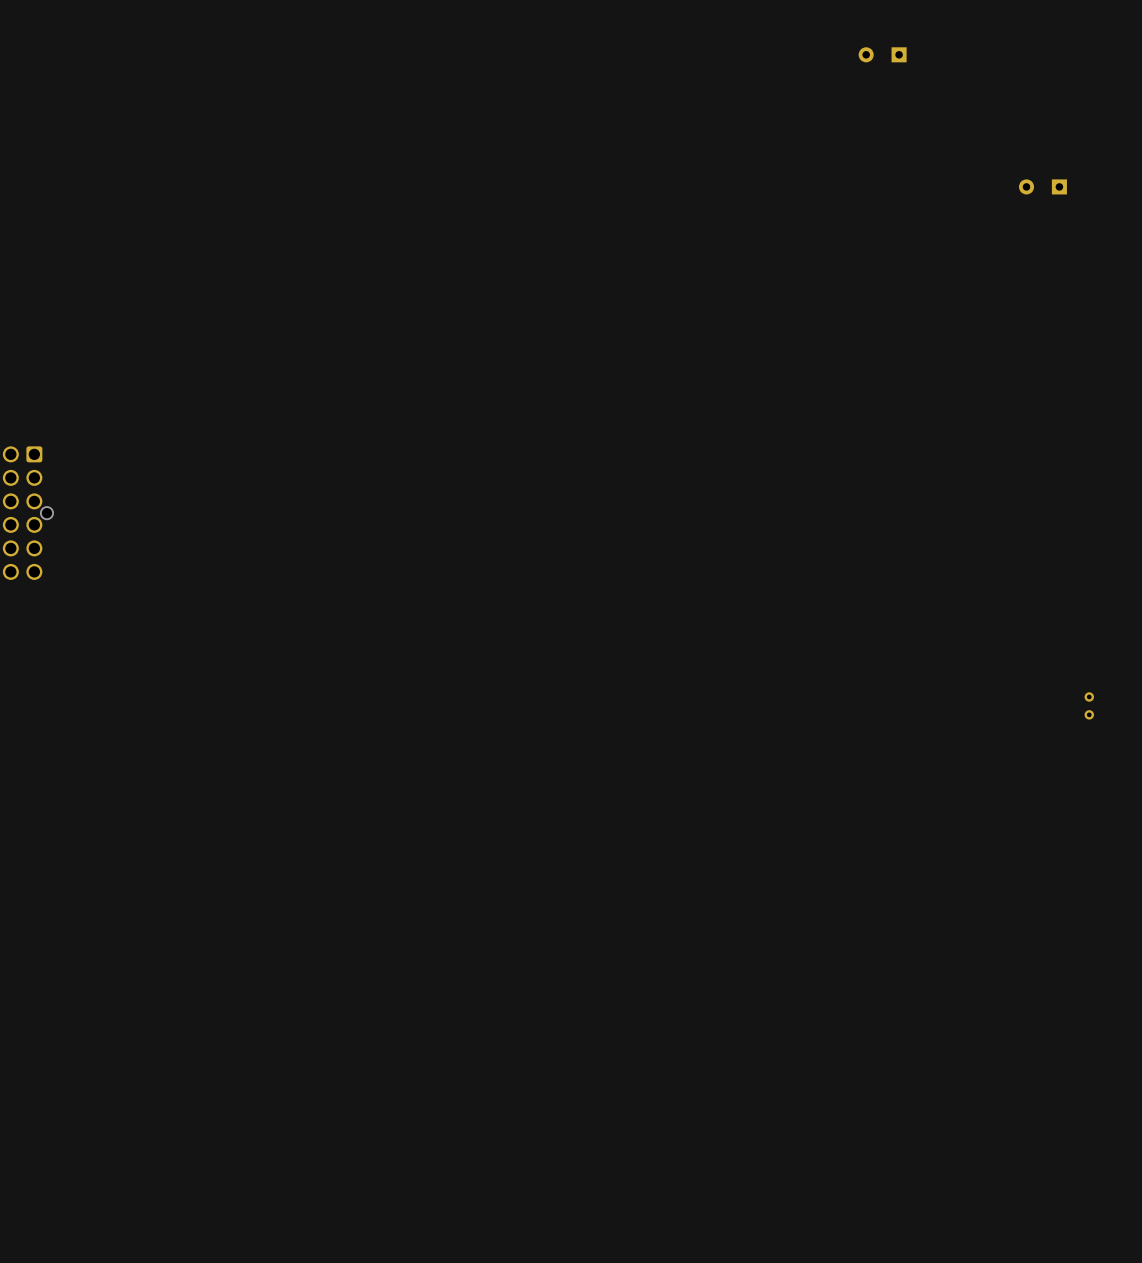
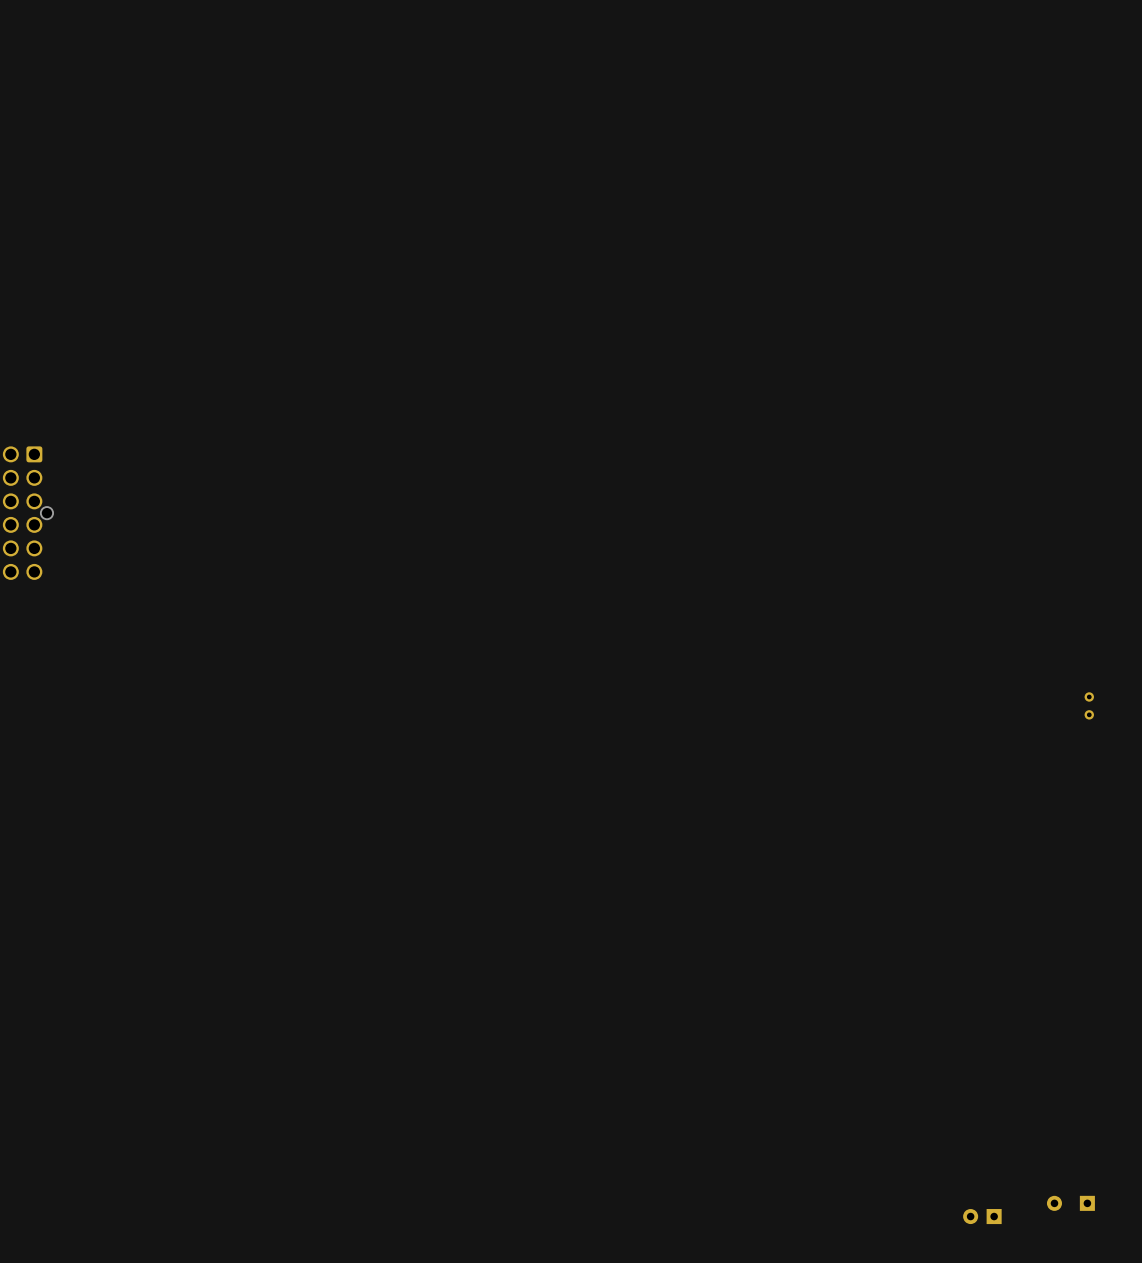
part: (882, 54) -> none
part: (1042, 186) -> none
part: none -> (1070, 1203)
part: none -> (982, 1216)

